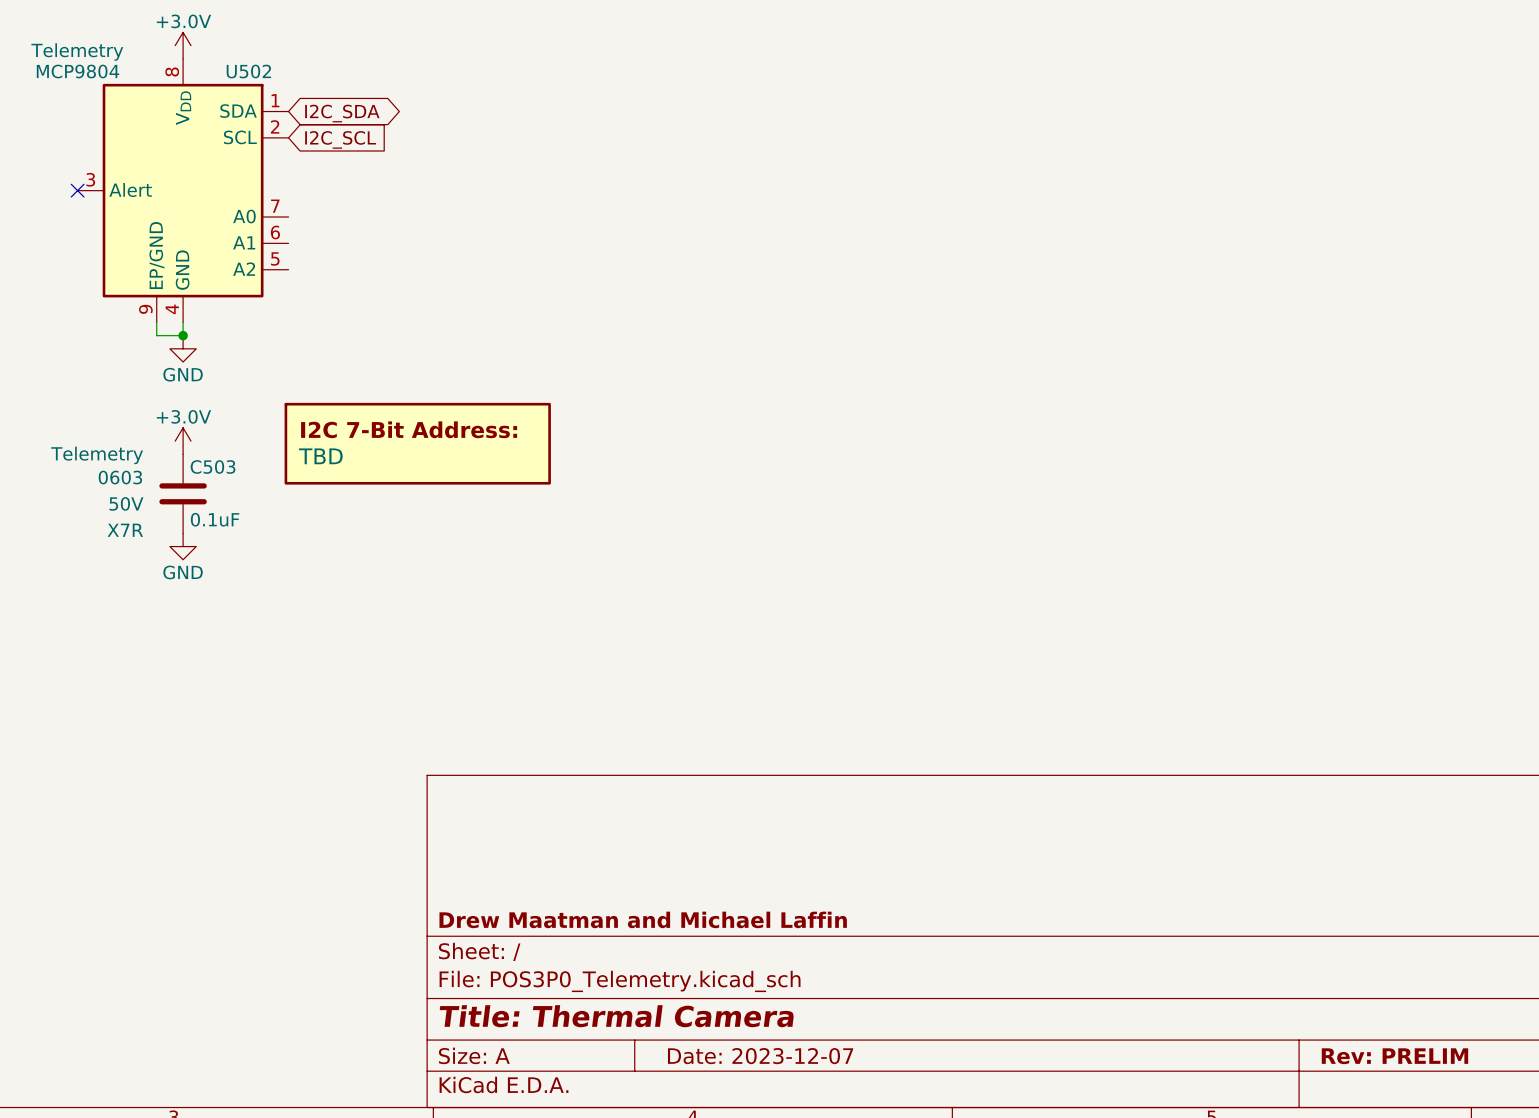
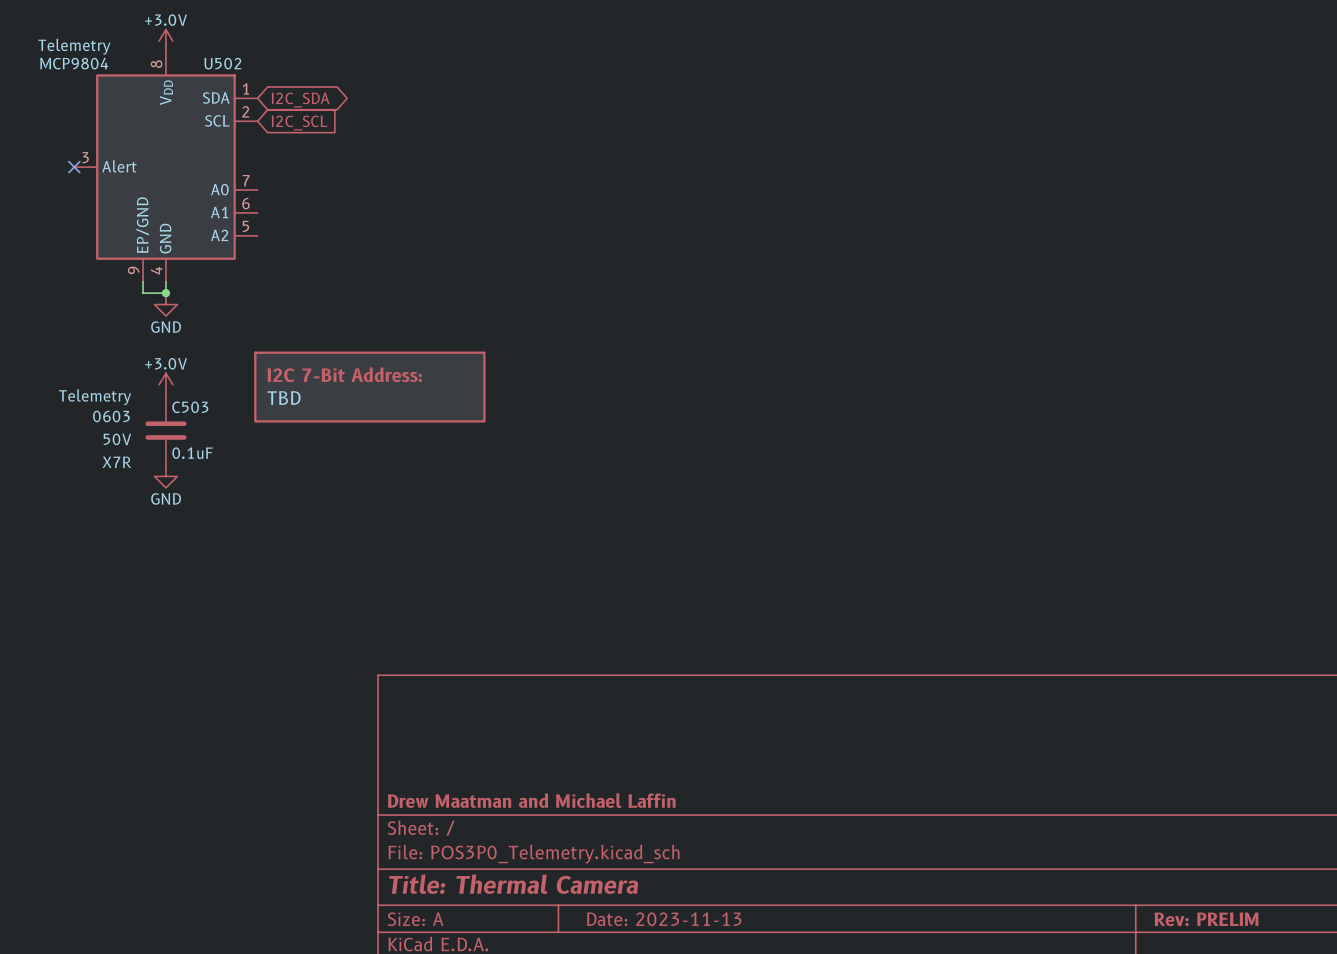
title block: Date: 2023-12-07 (760, 1056) -> Date: 2023-11-13 (664, 919)

